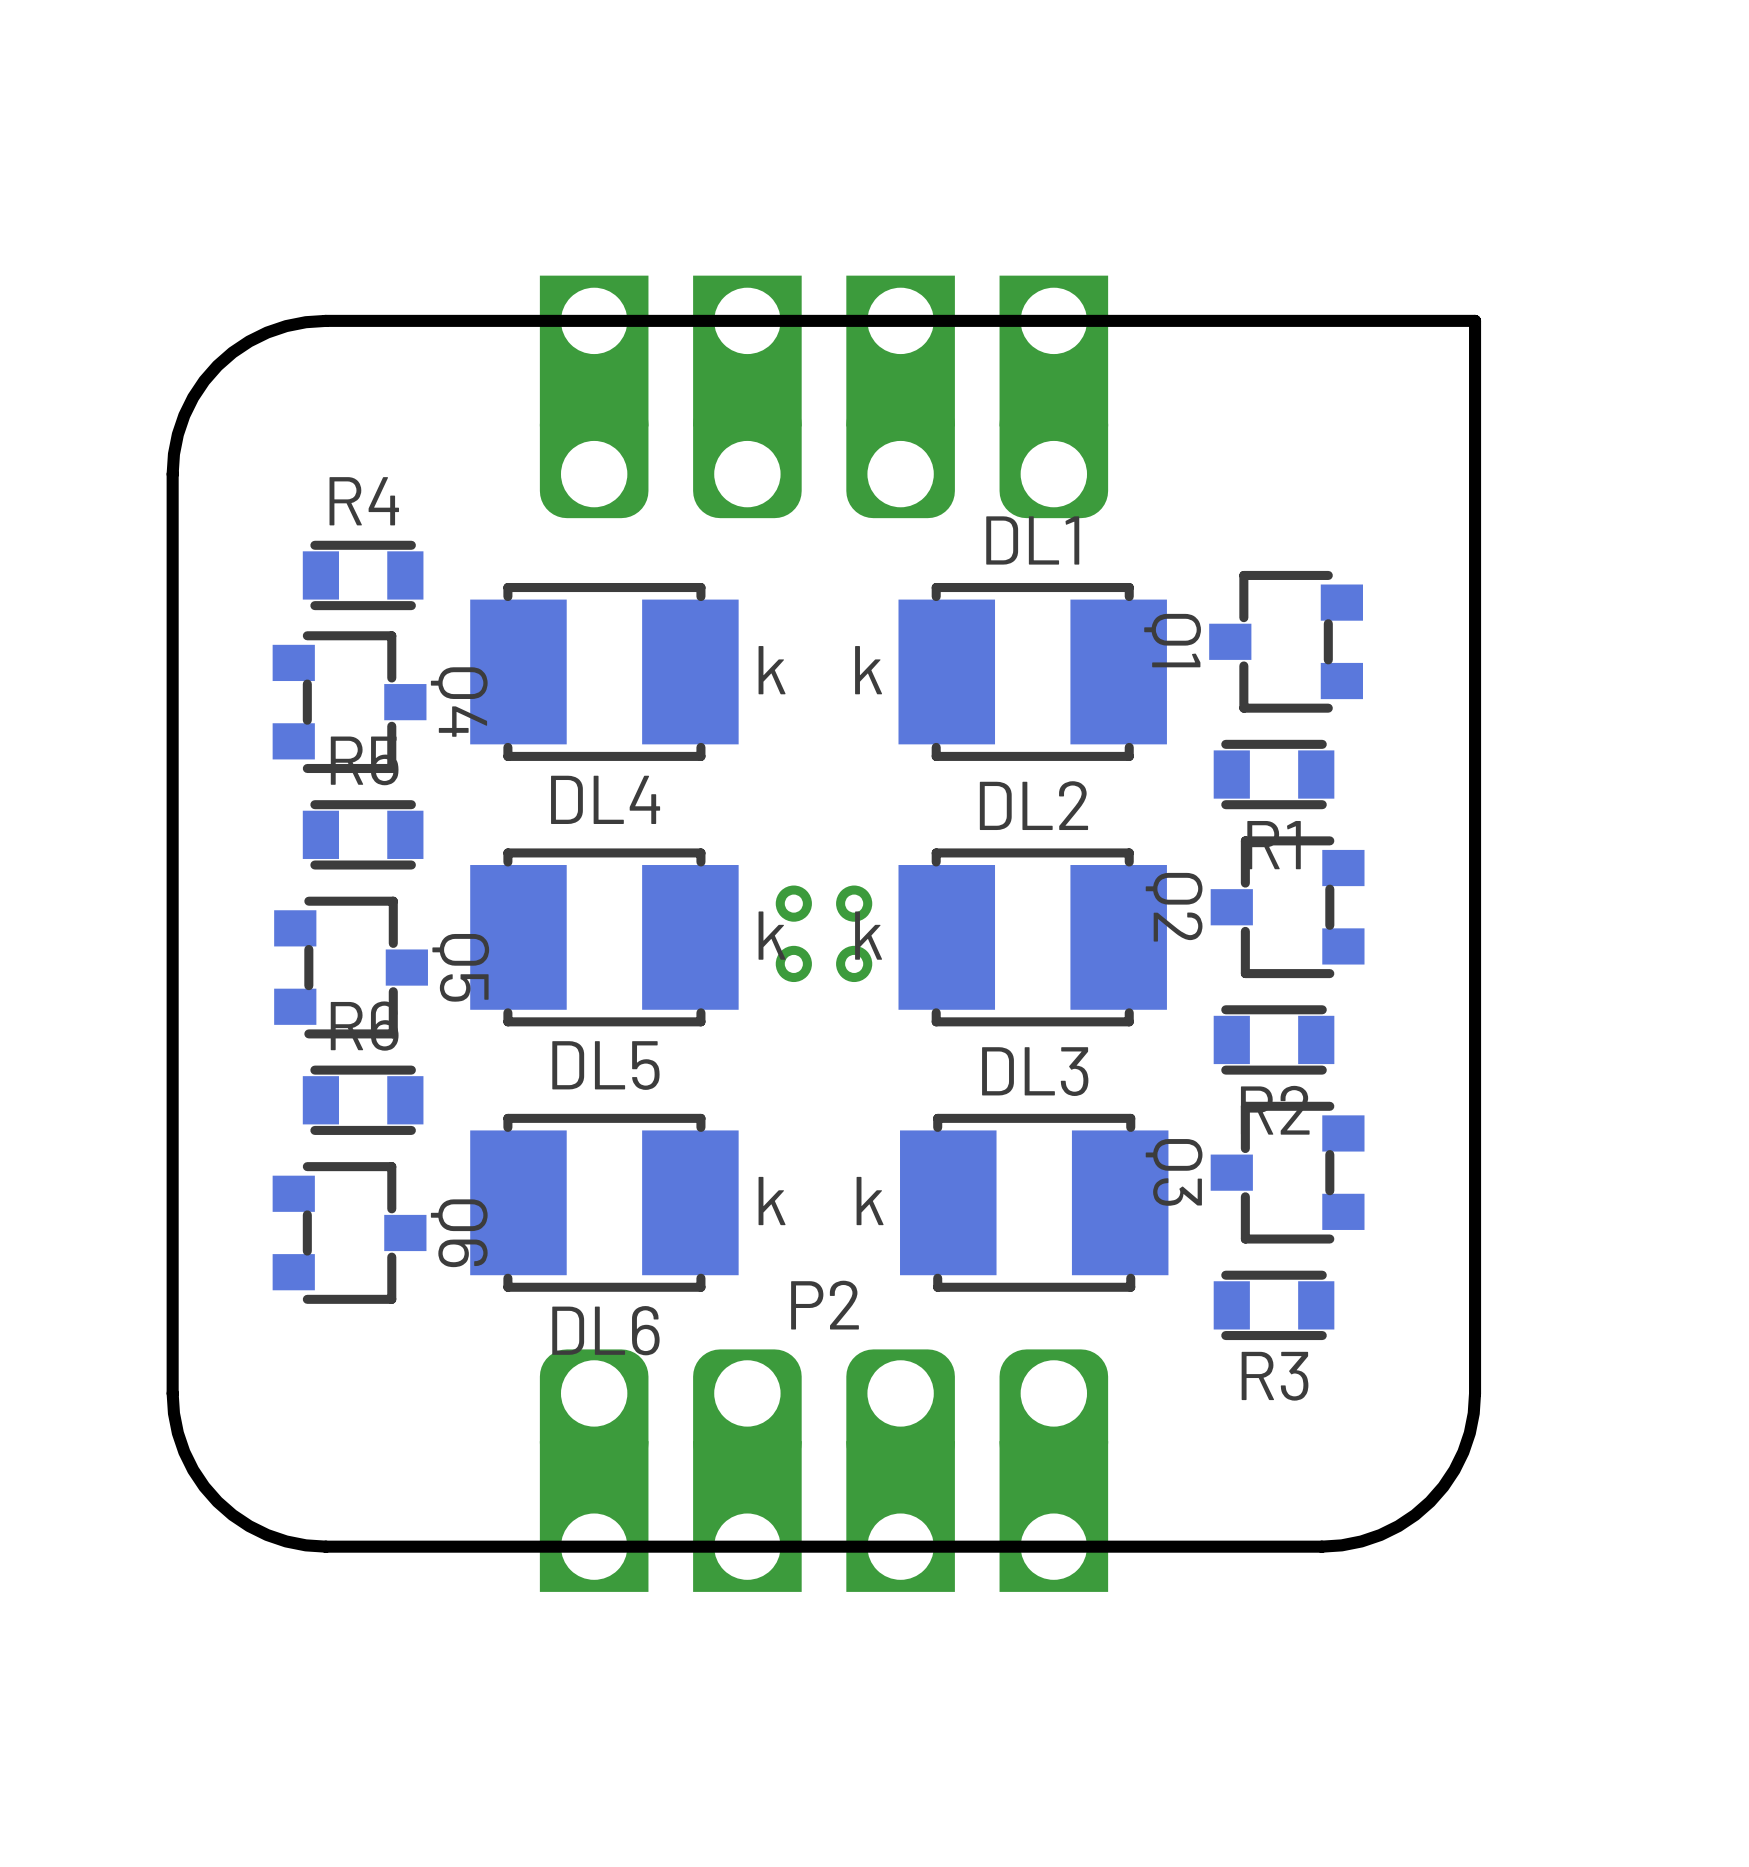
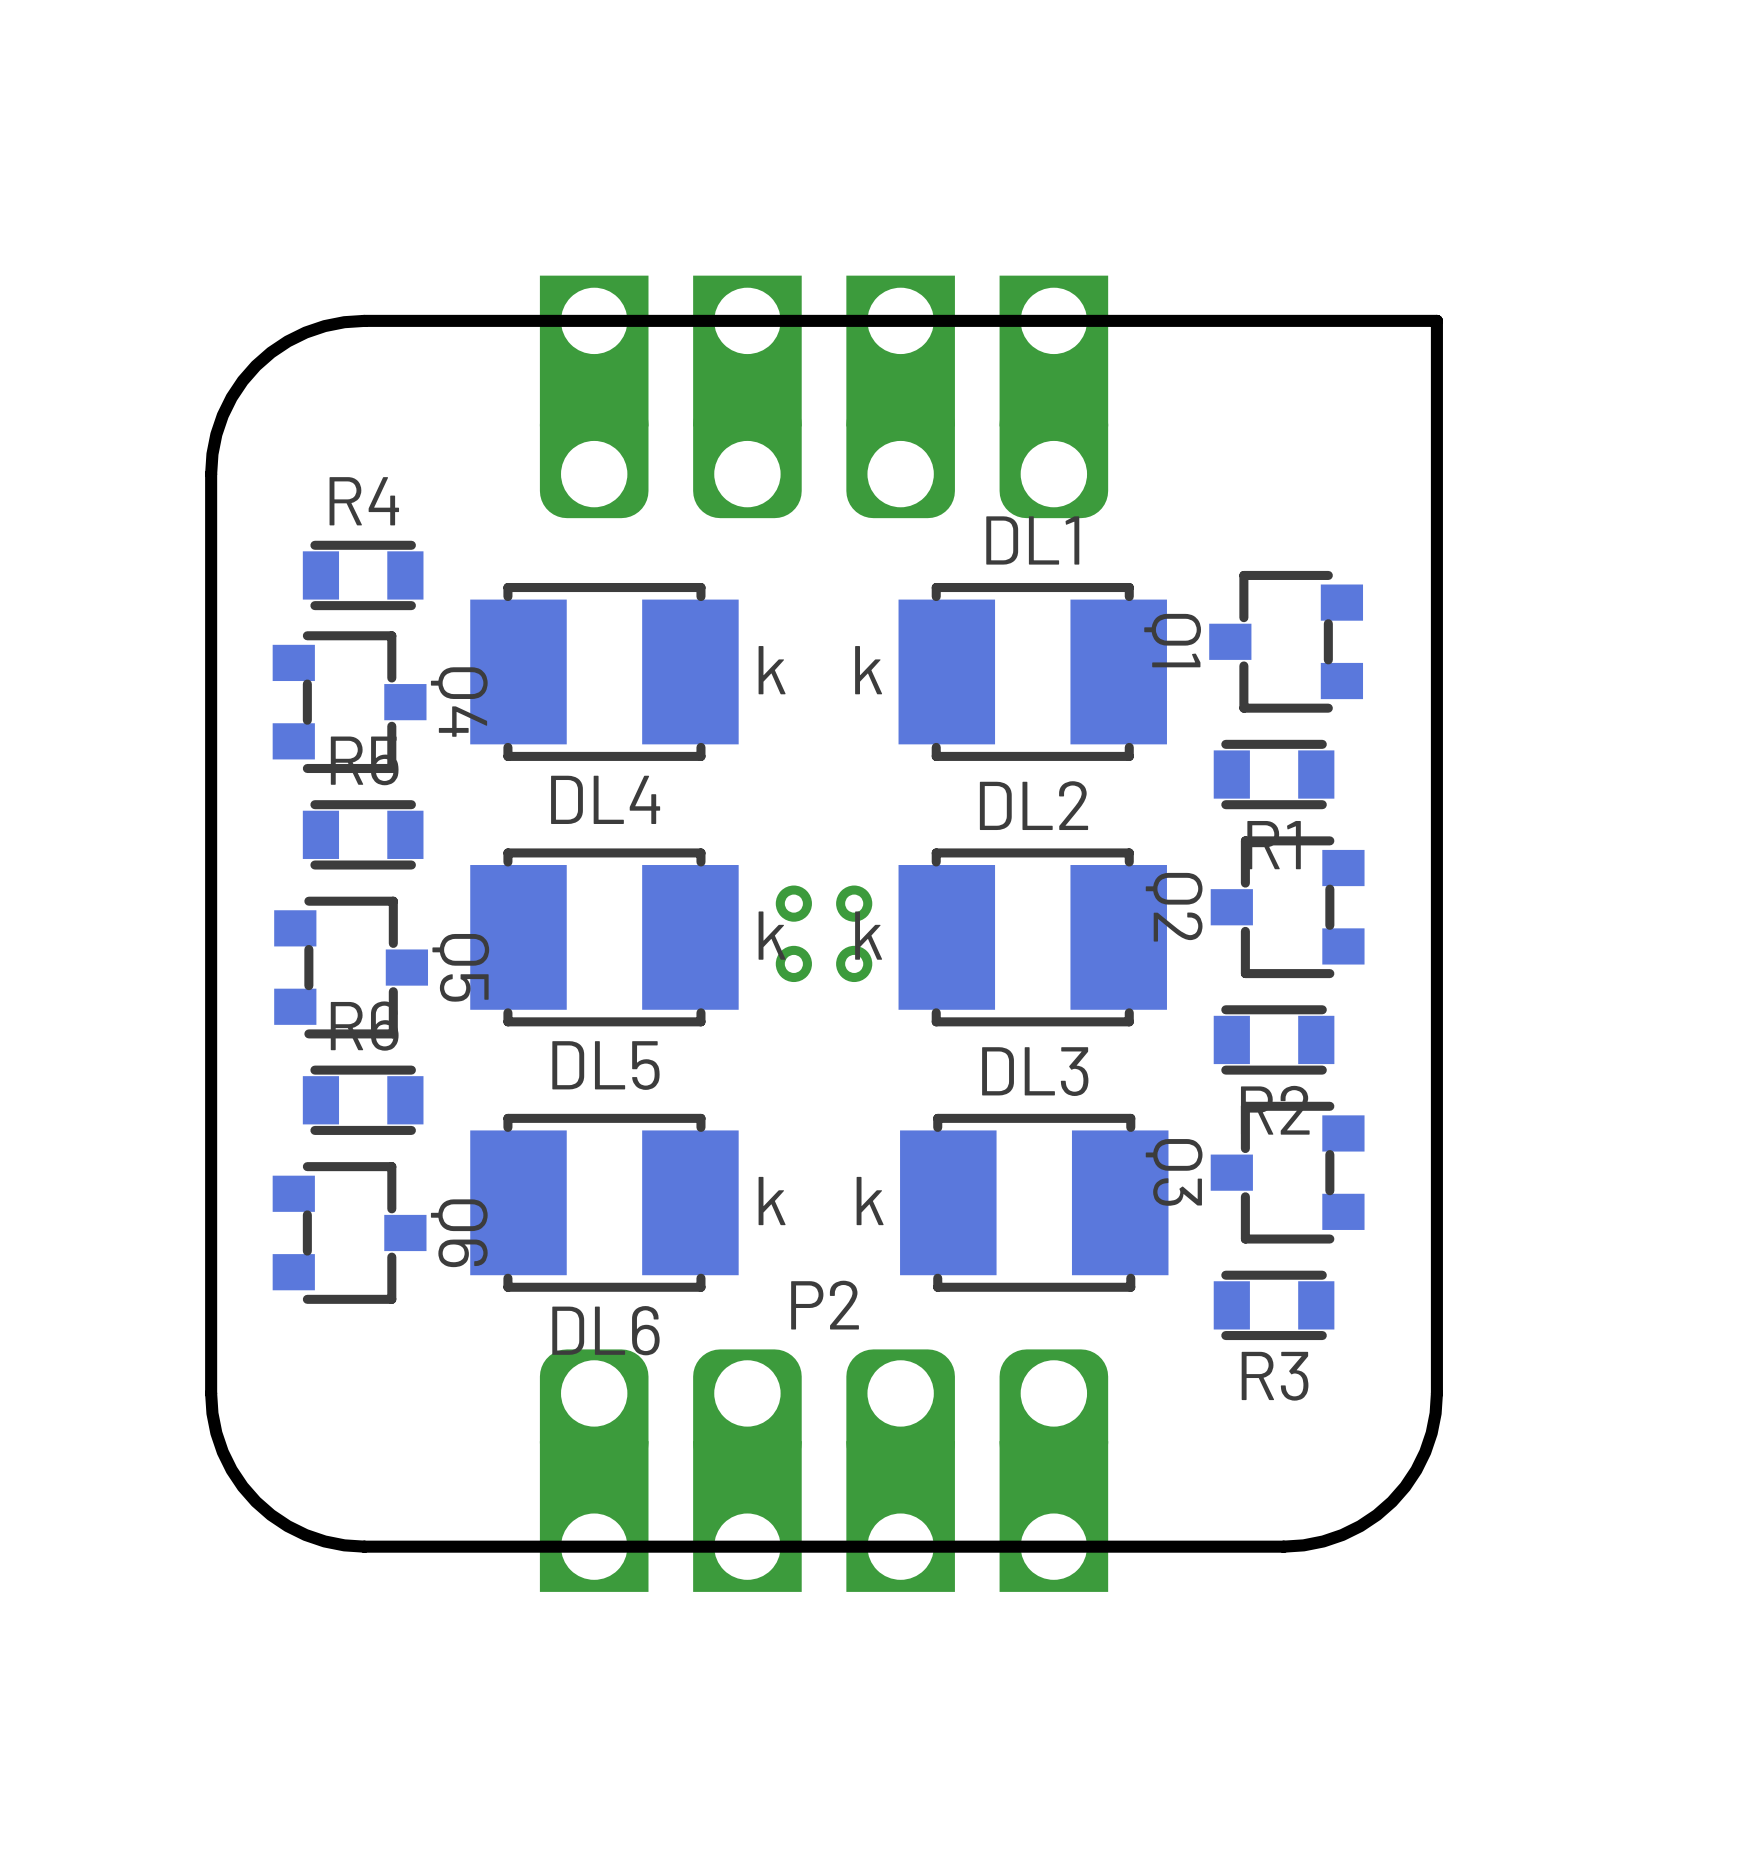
board edge: (364, 320) (305, 322) (286, 326) (267, 332) (232, 352) (204, 380) (184, 415) (177, 434) (172, 474) (173, 1413) (177, 1433) (193, 1470) (217, 1501) (232, 1515) (267, 1535) (286, 1541) (305, 1545) (364, 1546) -> (364, 320) (324, 326) (305, 332) (287, 341) (256, 365) (231, 397) (222, 415) (216, 434) (211, 474) (212, 1413) (216, 1433) (231, 1470) (256, 1501) (271, 1515) (305, 1535) (324, 1541) (364, 1546)
board edge: (1436, 320) (1475, 320) (1473, 1413) (1469, 1433) (1454, 1470) (1430, 1501) (1415, 1515) (1380, 1535) (1361, 1541) (1341, 1545) (1283, 1546) -> (1436, 320) (1435, 1413) (1425, 1452) (1405, 1486) (1392, 1501) (1360, 1526) (1342, 1535) (1323, 1541) (1283, 1546)

